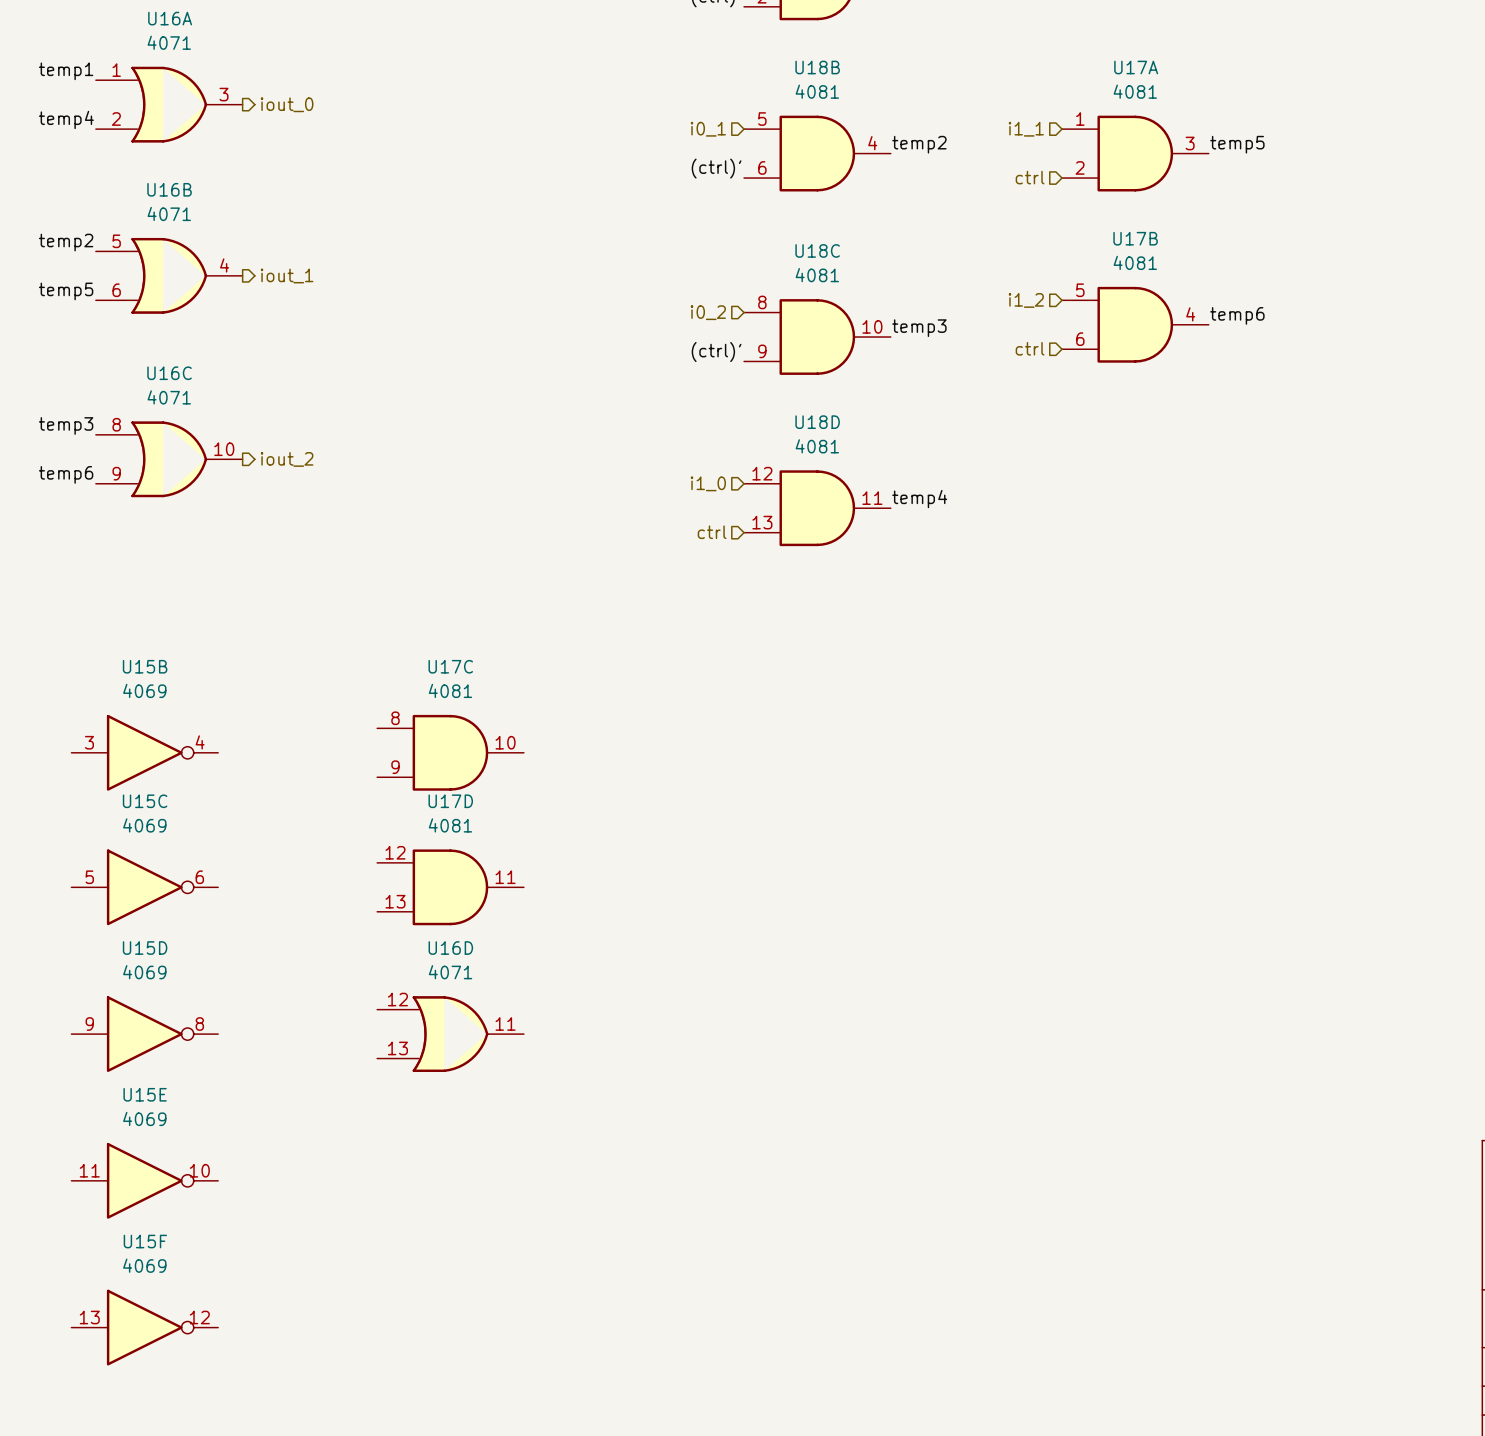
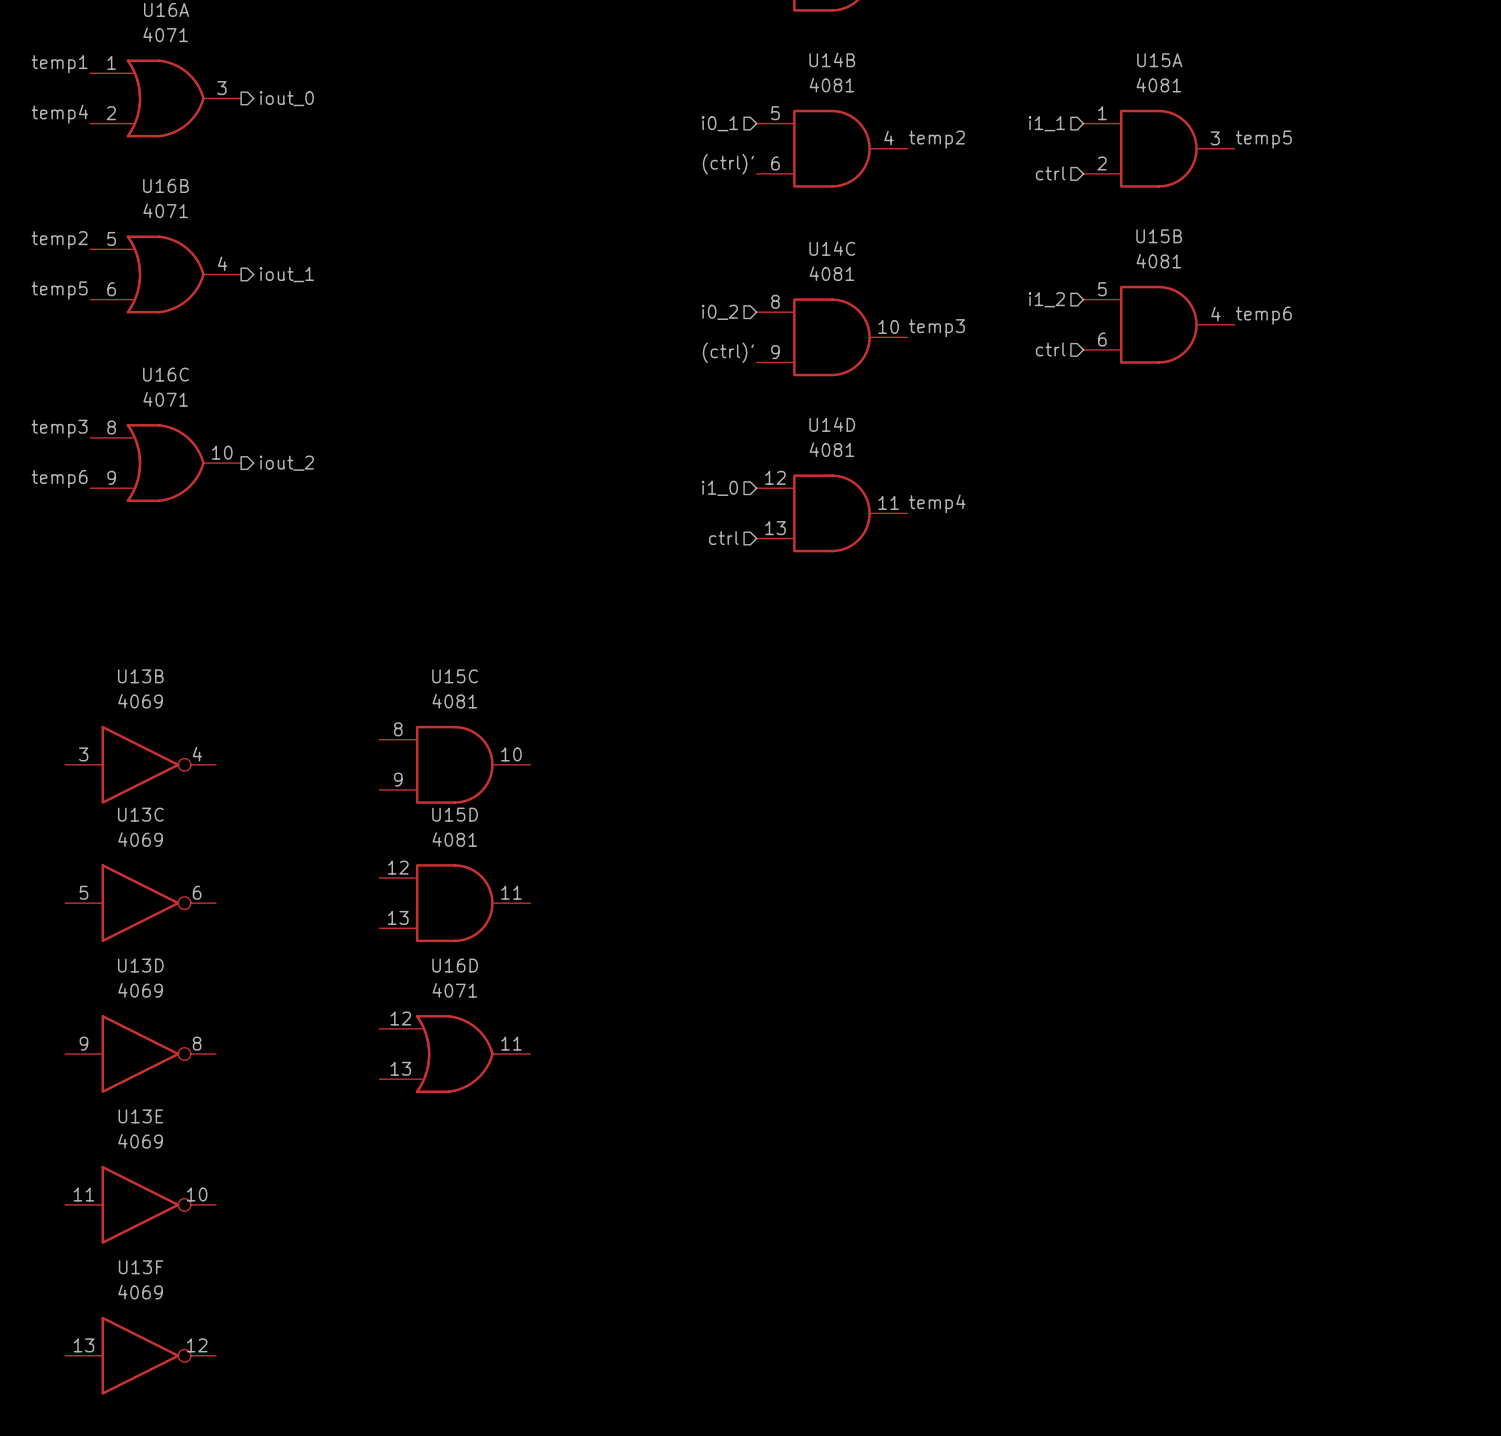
U18B name: U18B (817, 67) -> U14B (832, 59)
U17A name: U17A (1136, 67) -> U15A (1159, 60)
U17B name: U17B (1135, 238) -> U15B (1159, 236)
U18C name: U18C (817, 250) -> U14C (832, 248)
U18D name: U18D (817, 422) -> U14D (832, 424)
U15B name: U15B (145, 666) -> U13B (140, 676)
U17C name: U17C (450, 666) -> U15C (455, 676)
U15C name: U15C (145, 801) -> U13C (140, 814)
U17D name: U17D (450, 801) -> U15D (455, 814)
U15D name: U15D (145, 948) -> U13D (140, 965)
U15E name: U15E (145, 1094) -> U13E (140, 1116)
U15F name: U15F (145, 1241) -> U13F (141, 1267)

